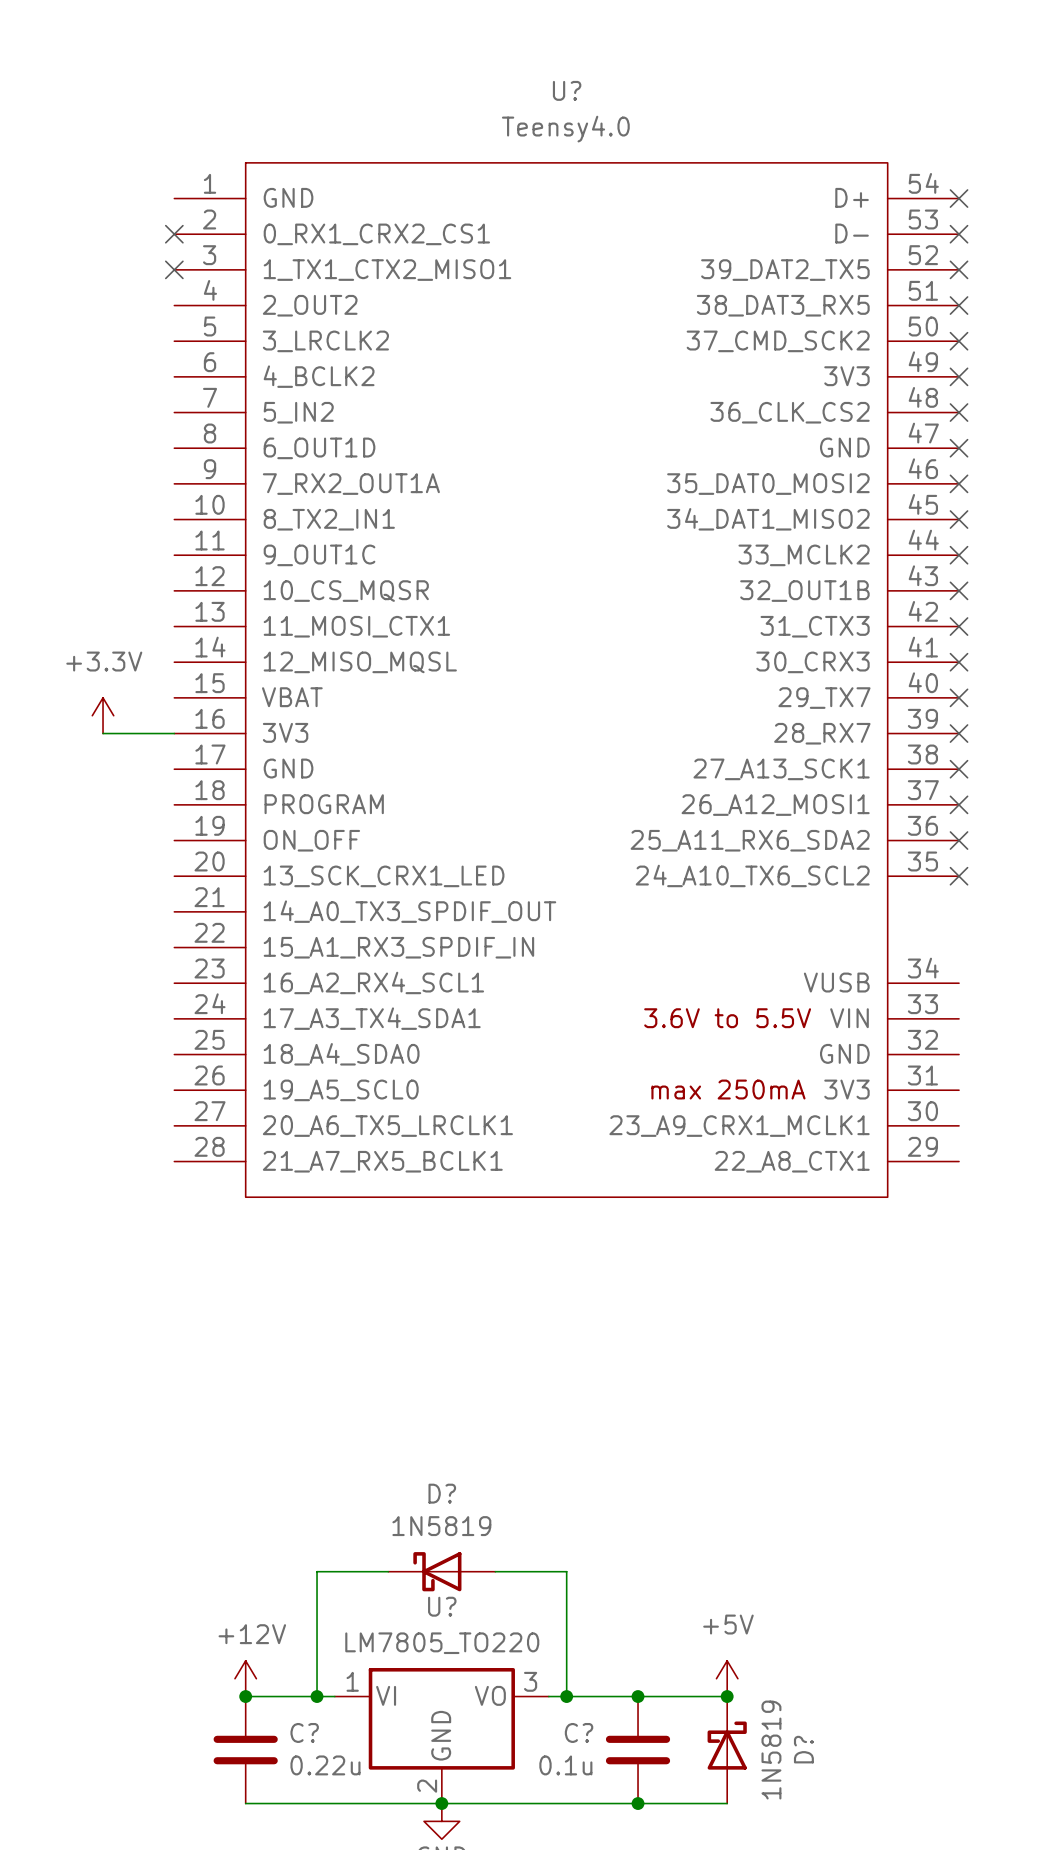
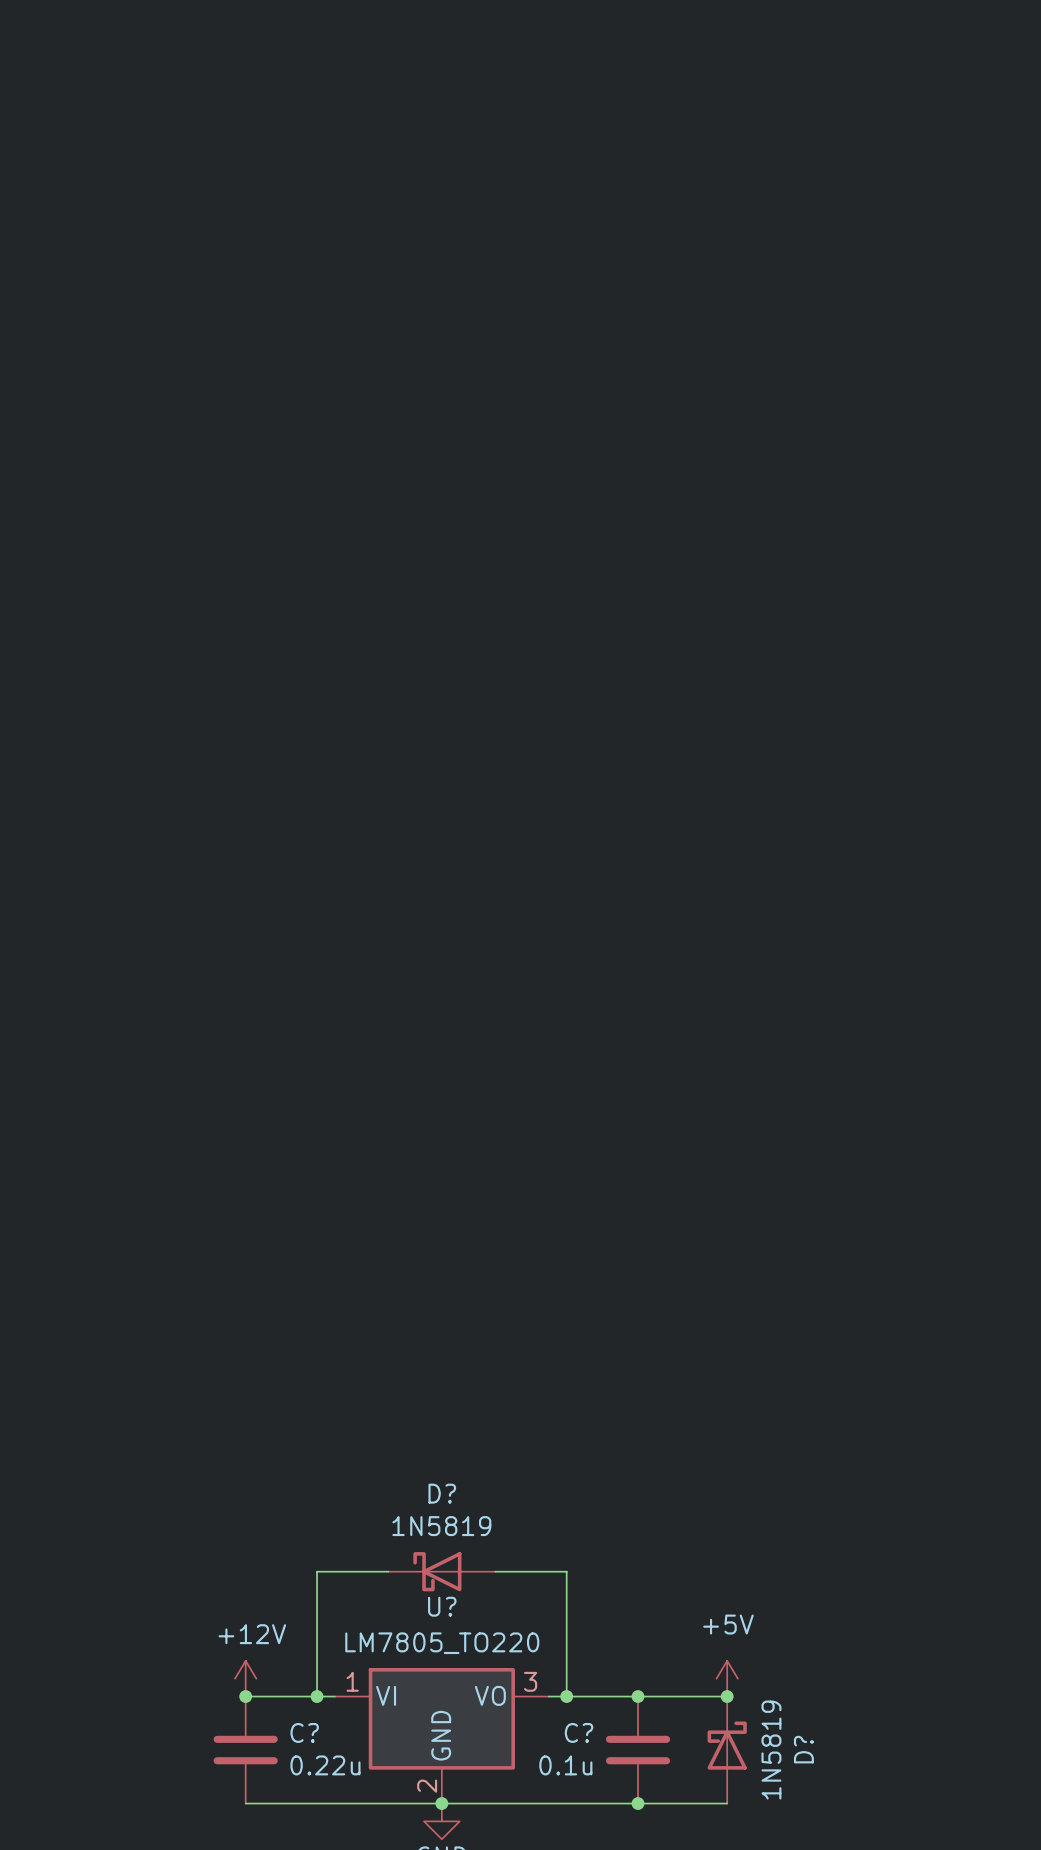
no-connect mark: (959, 198) -> none
no-connect mark: (174, 234) -> none
no-connect mark: (959, 234) -> none
no-connect mark: (174, 269) -> none
no-connect mark: (959, 269) -> none
no-connect mark: (959, 305) -> none
no-connect mark: (959, 341) -> none
no-connect mark: (959, 376) -> none
no-connect mark: (959, 412) -> none
no-connect mark: (959, 448) -> none
no-connect mark: (959, 483) -> none
no-connect mark: (959, 519) -> none
no-connect mark: (959, 555) -> none
no-connect mark: (959, 590) -> none
no-connect mark: (959, 626) -> none
no-connect mark: (959, 662) -> none
U?: Teensy4.0 (566, 680) -> none
no-connect mark: (959, 697) -> none
power symbol: +3.3V (103, 715) -> none
wire: (103, 733) (174, 733) -> none
no-connect mark: (959, 733) -> none
no-connect mark: (959, 769) -> none
no-connect mark: (959, 804) -> none
no-connect mark: (959, 840) -> none
no-connect mark: (959, 876) -> none

